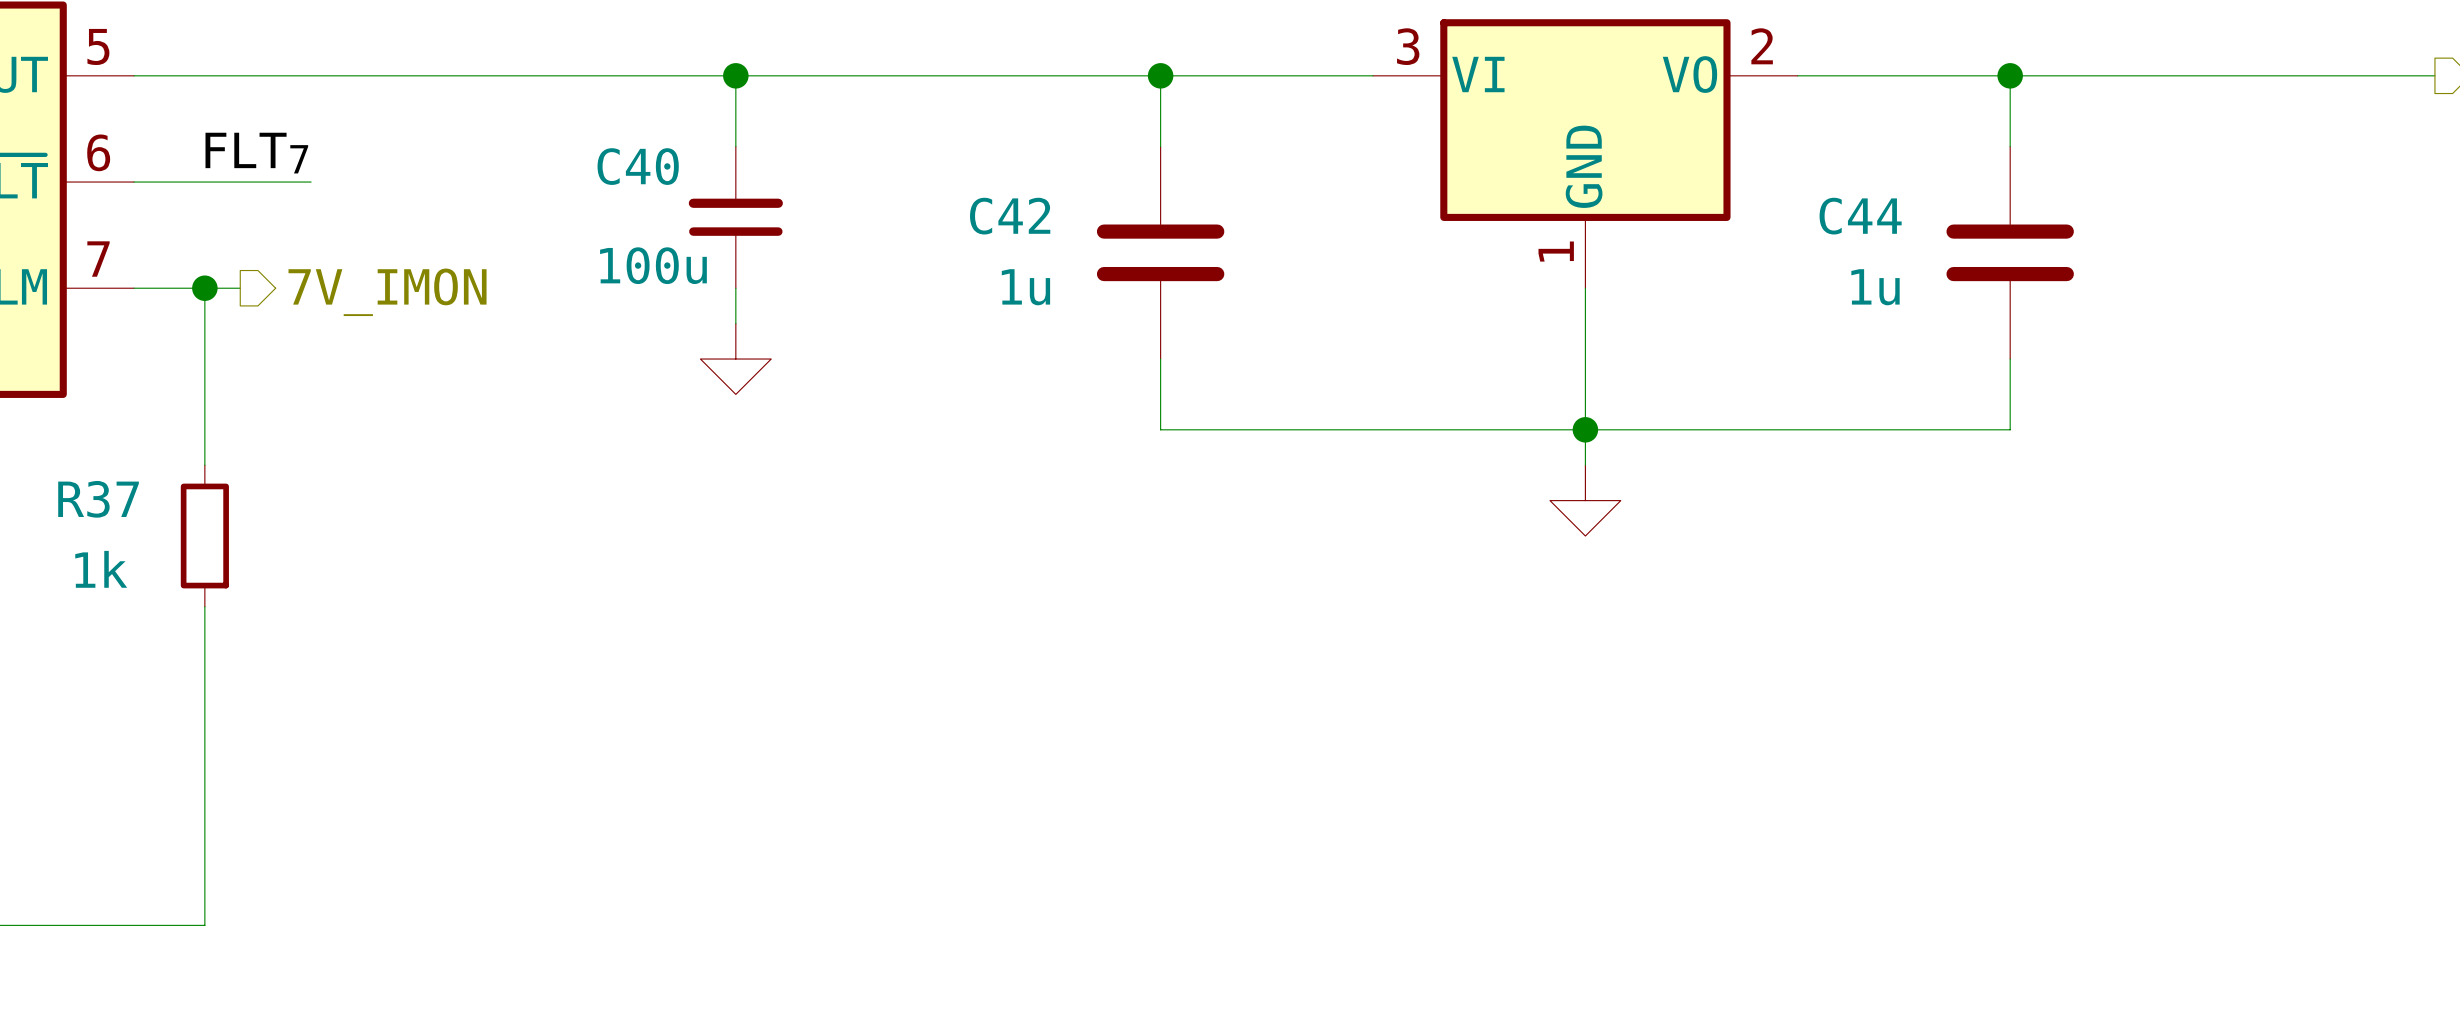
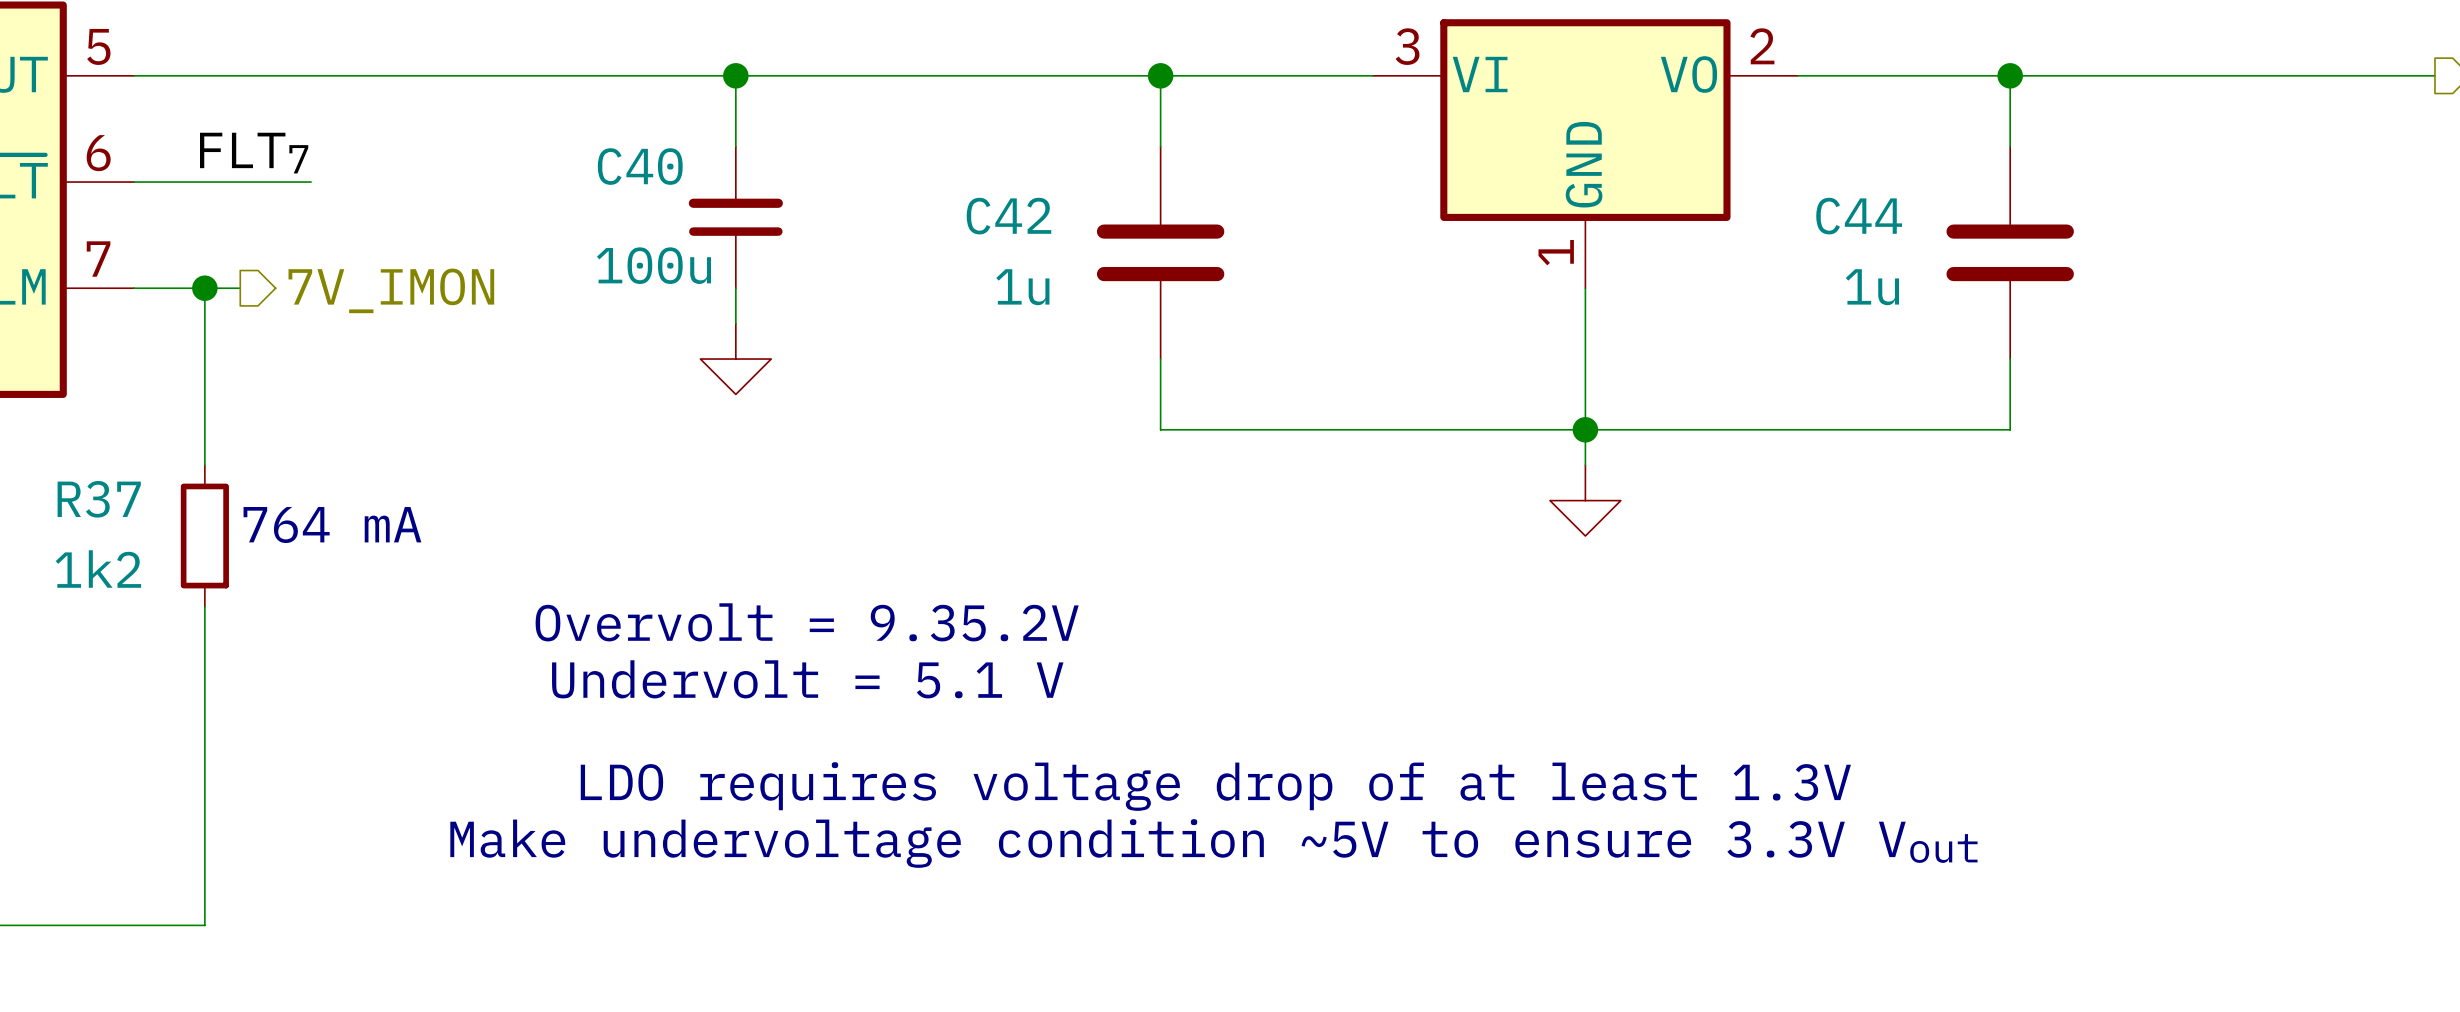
text: none -> 764 mA (332, 525)
R37 value: 1k (101, 569) -> 1k2 (98, 569)
text: none -> Overvolt = 9.35.2V (807, 622)
text: none -> Undervolt = 5.1 V (807, 679)
text: none -> LDO requires voltage drop of at least 1.3V (1215, 786)
text: none -> Make undervoltage condition ~5V to ensure 3.3V Vout (1213, 843)

